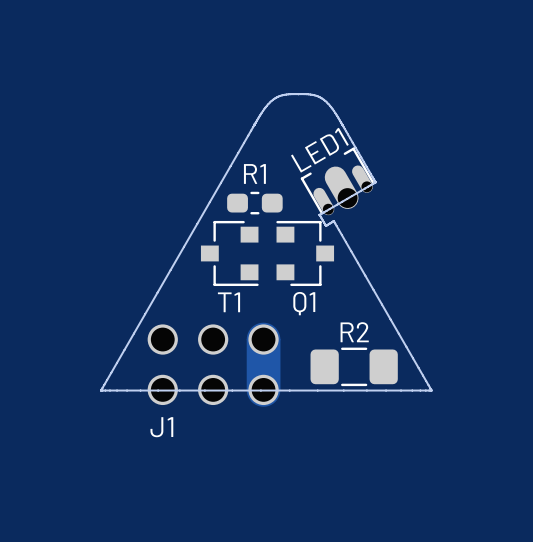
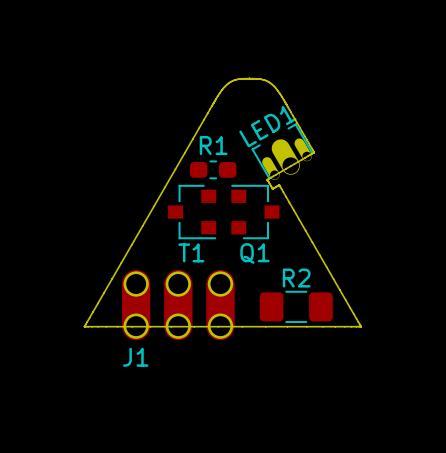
J1 footprint: [147, 322, 281, 407] -> [122, 269, 235, 341]

